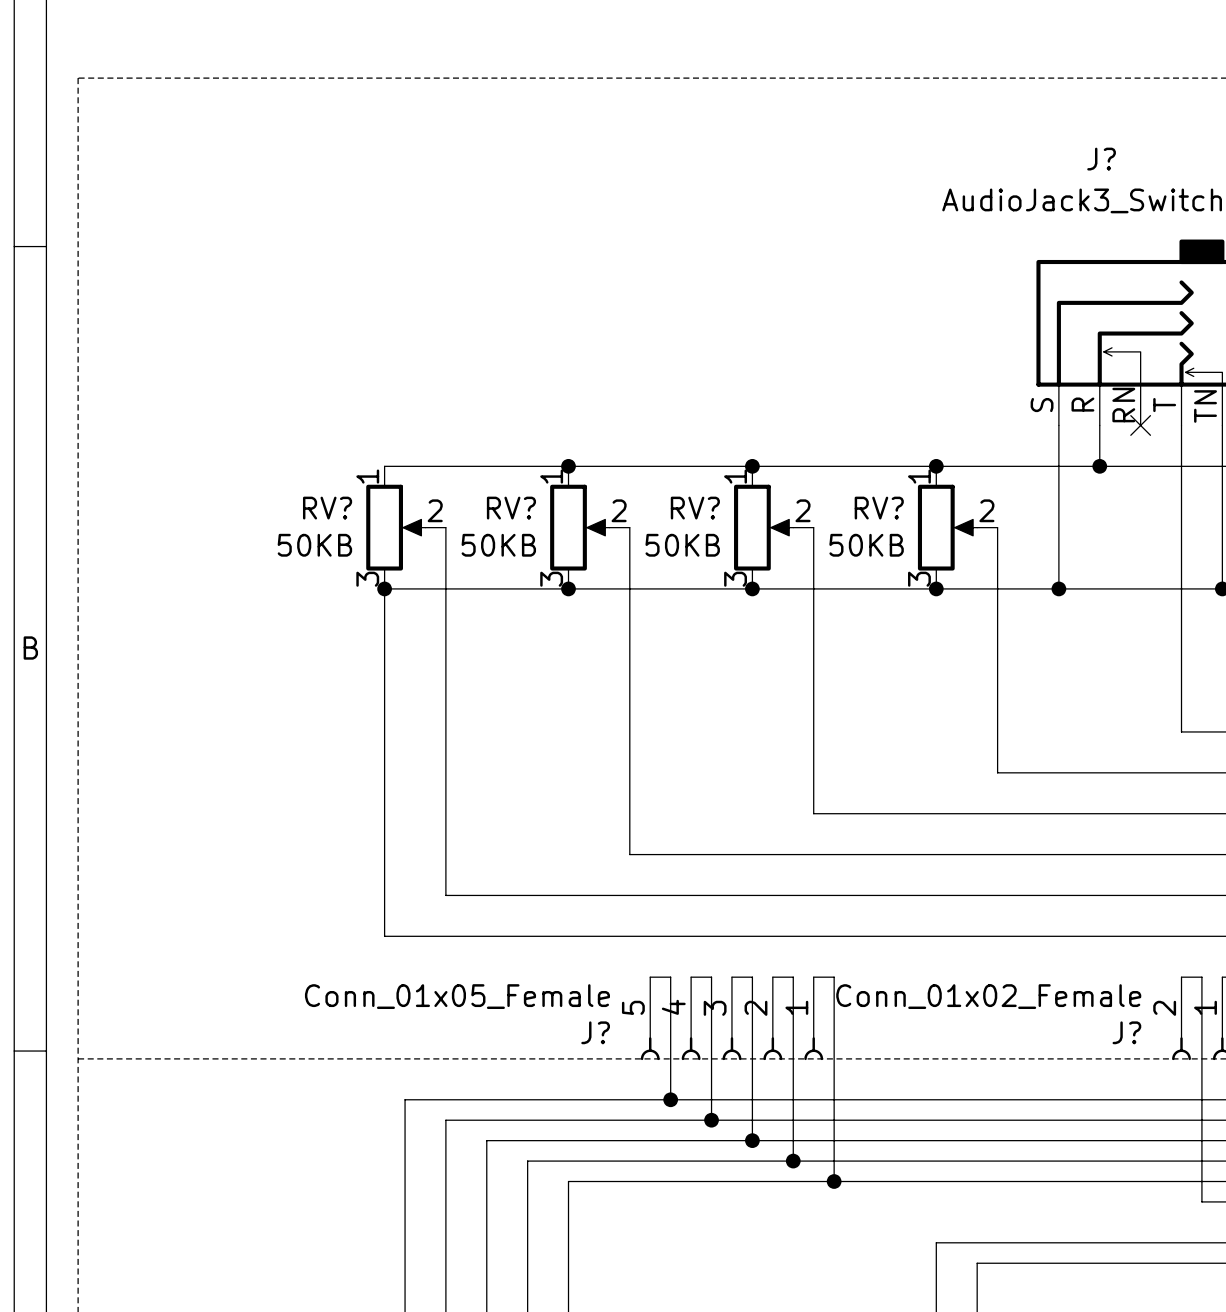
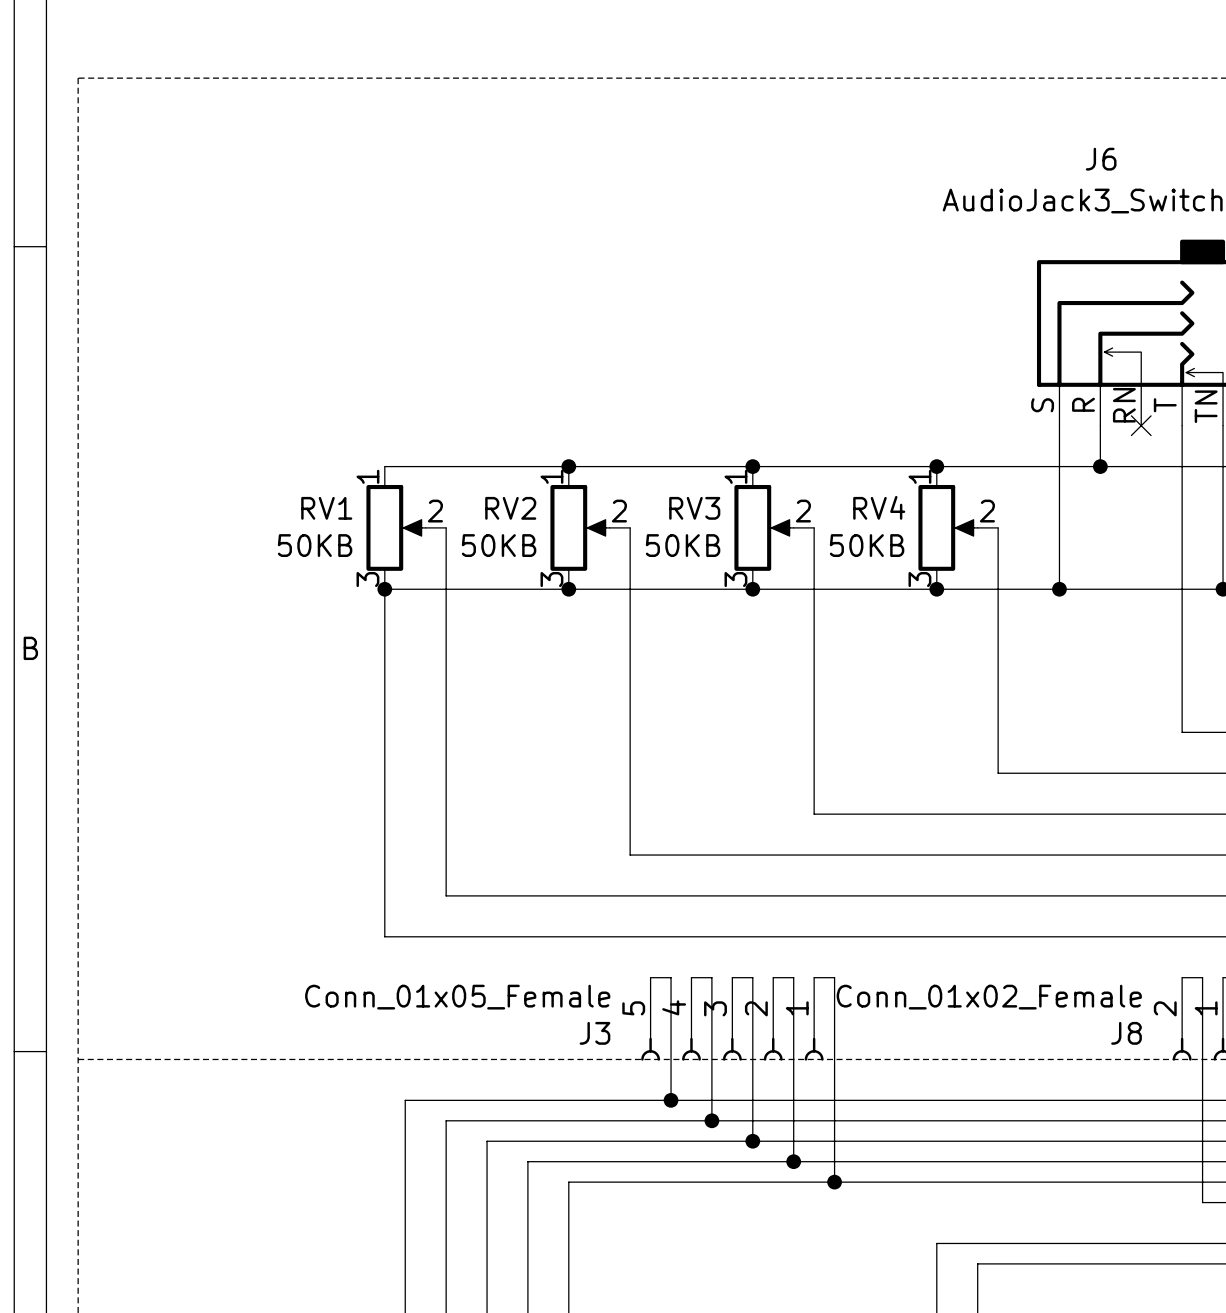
J? name: J? (1101, 159) -> J6 (1101, 159)
RV? name: RV? (327, 508) -> RV1 (326, 508)
RV? name: RV? (511, 508) -> RV2 (510, 508)
RV? name: RV? (695, 508) -> RV3 (694, 508)
RV? name: RV? (879, 508) -> RV4 (879, 507)
J? name: J? (595, 1032) -> J3 (594, 1033)
J? name: J? (1126, 1032) -> J8 (1126, 1033)

